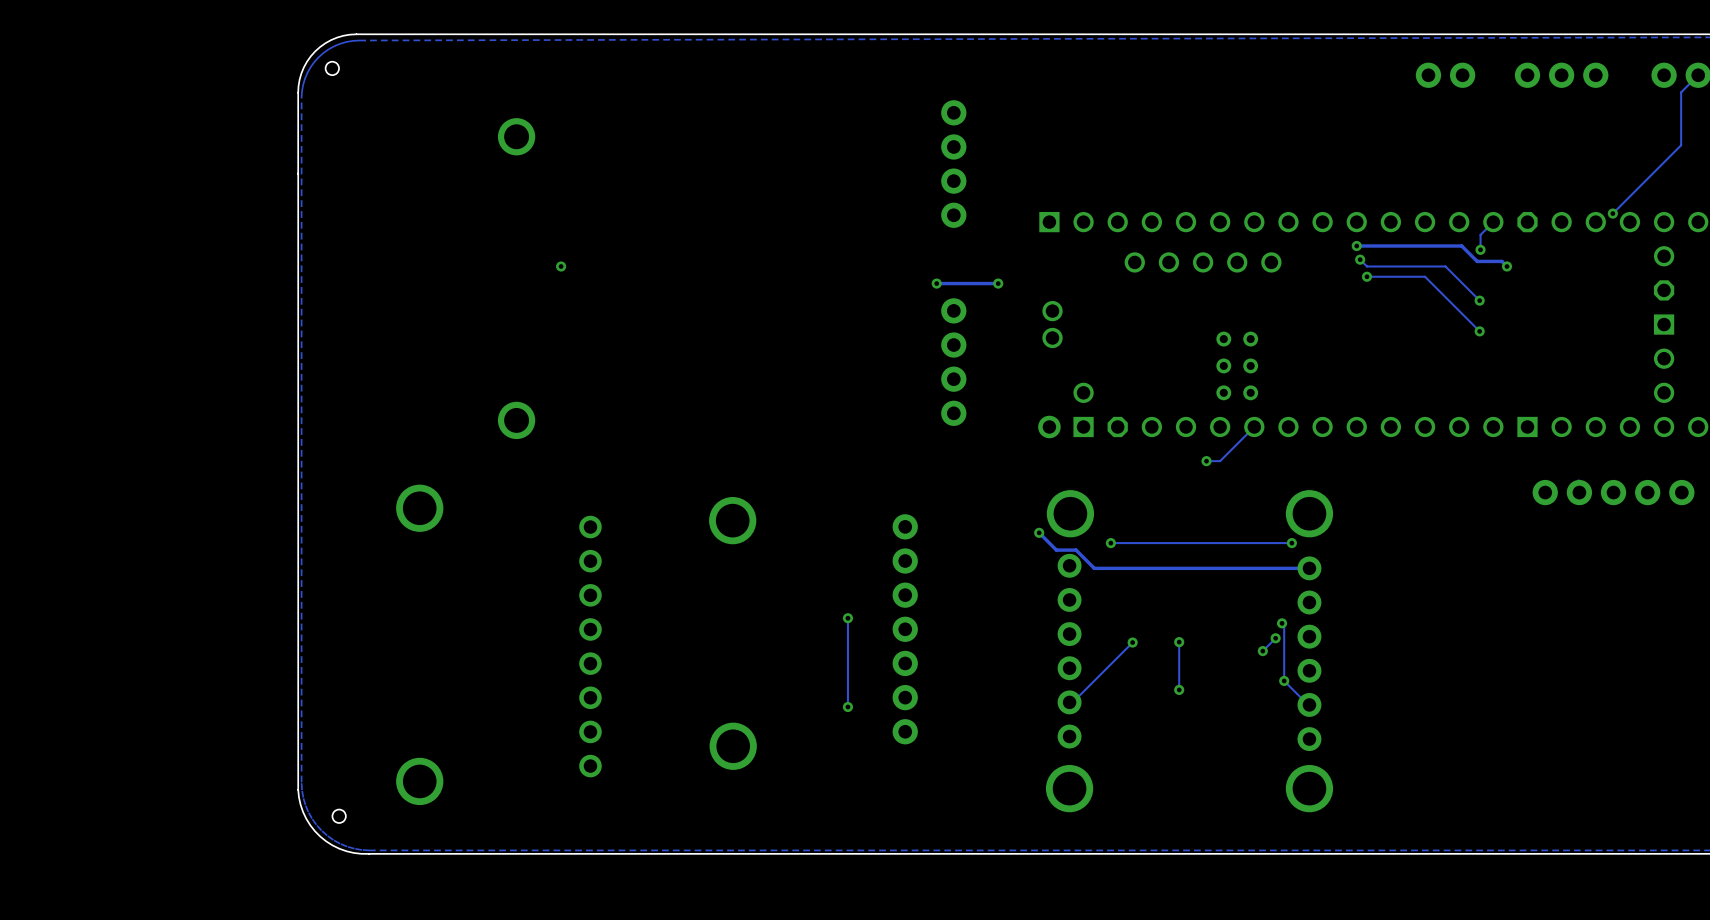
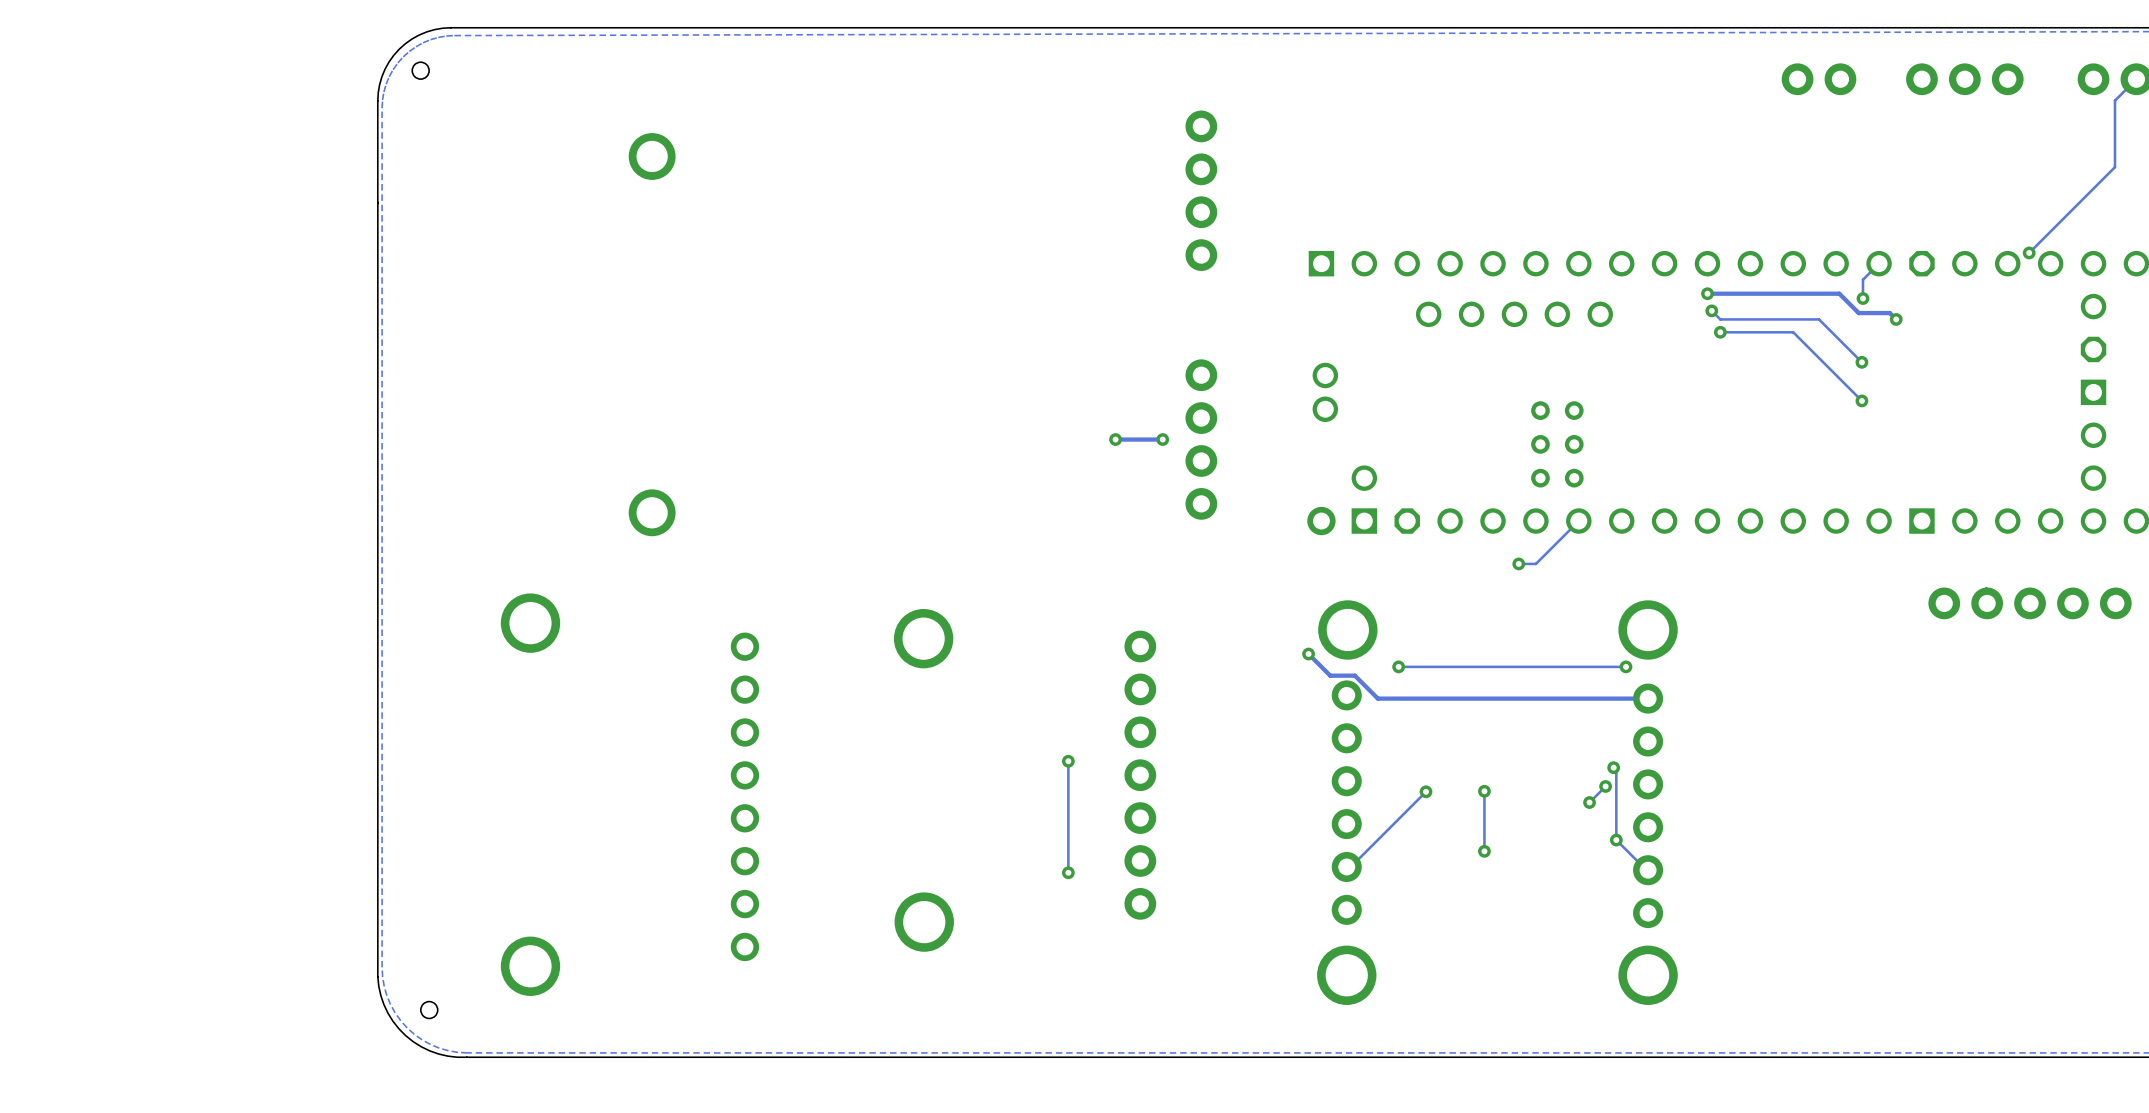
via: (561, 266) -> none
via: (936, 283) -> none
track: (998, 283) (936, 283) -> none
via: (998, 283) -> none
via: none -> (1115, 439)
track: none -> (1162, 439) (1115, 439)
via: none -> (1162, 439)

